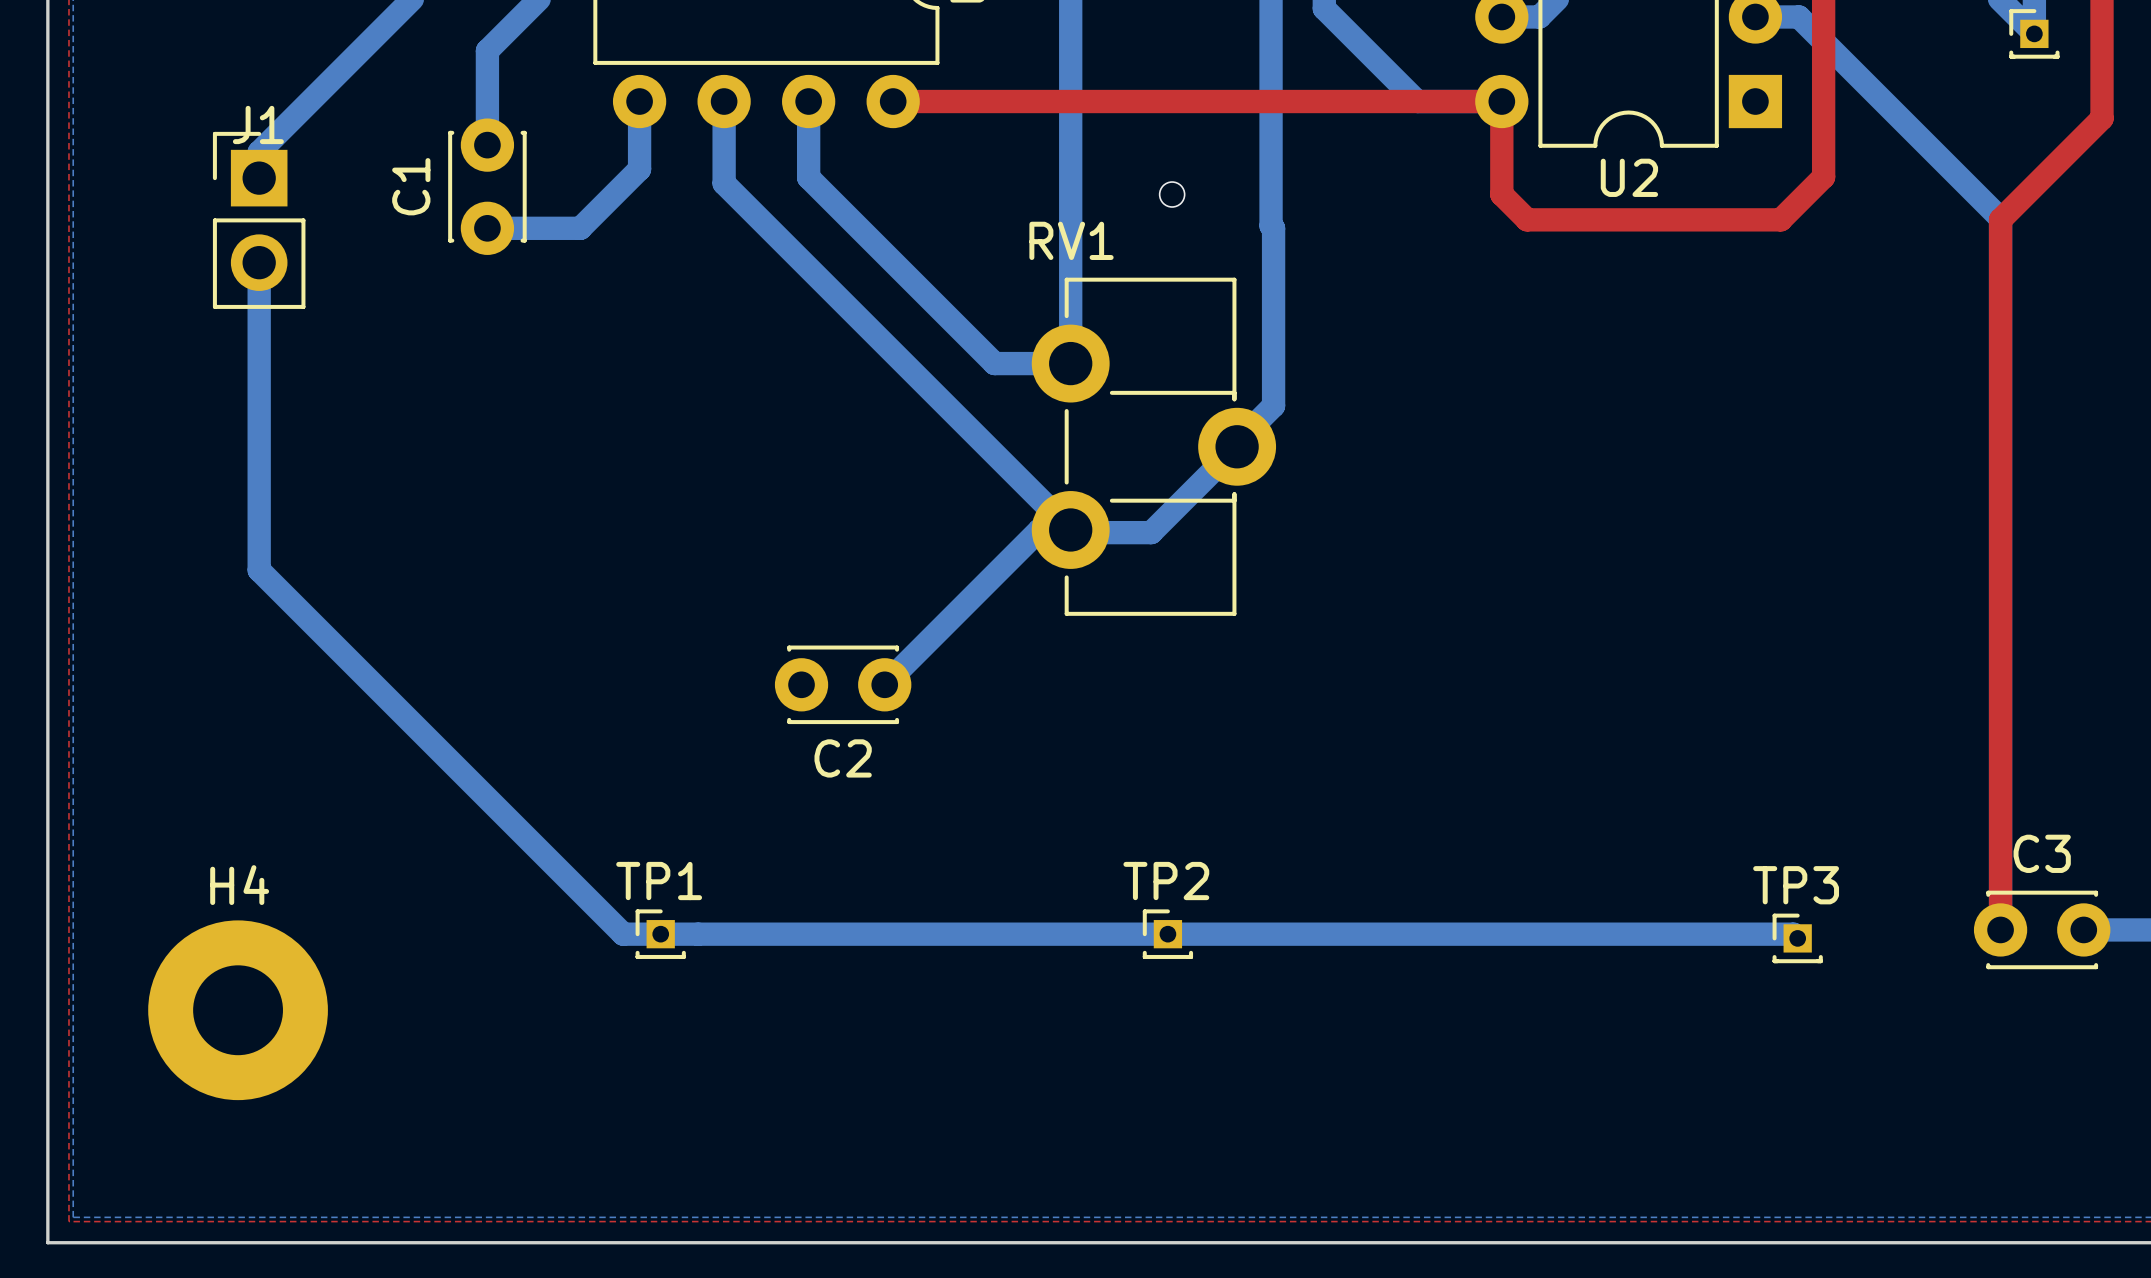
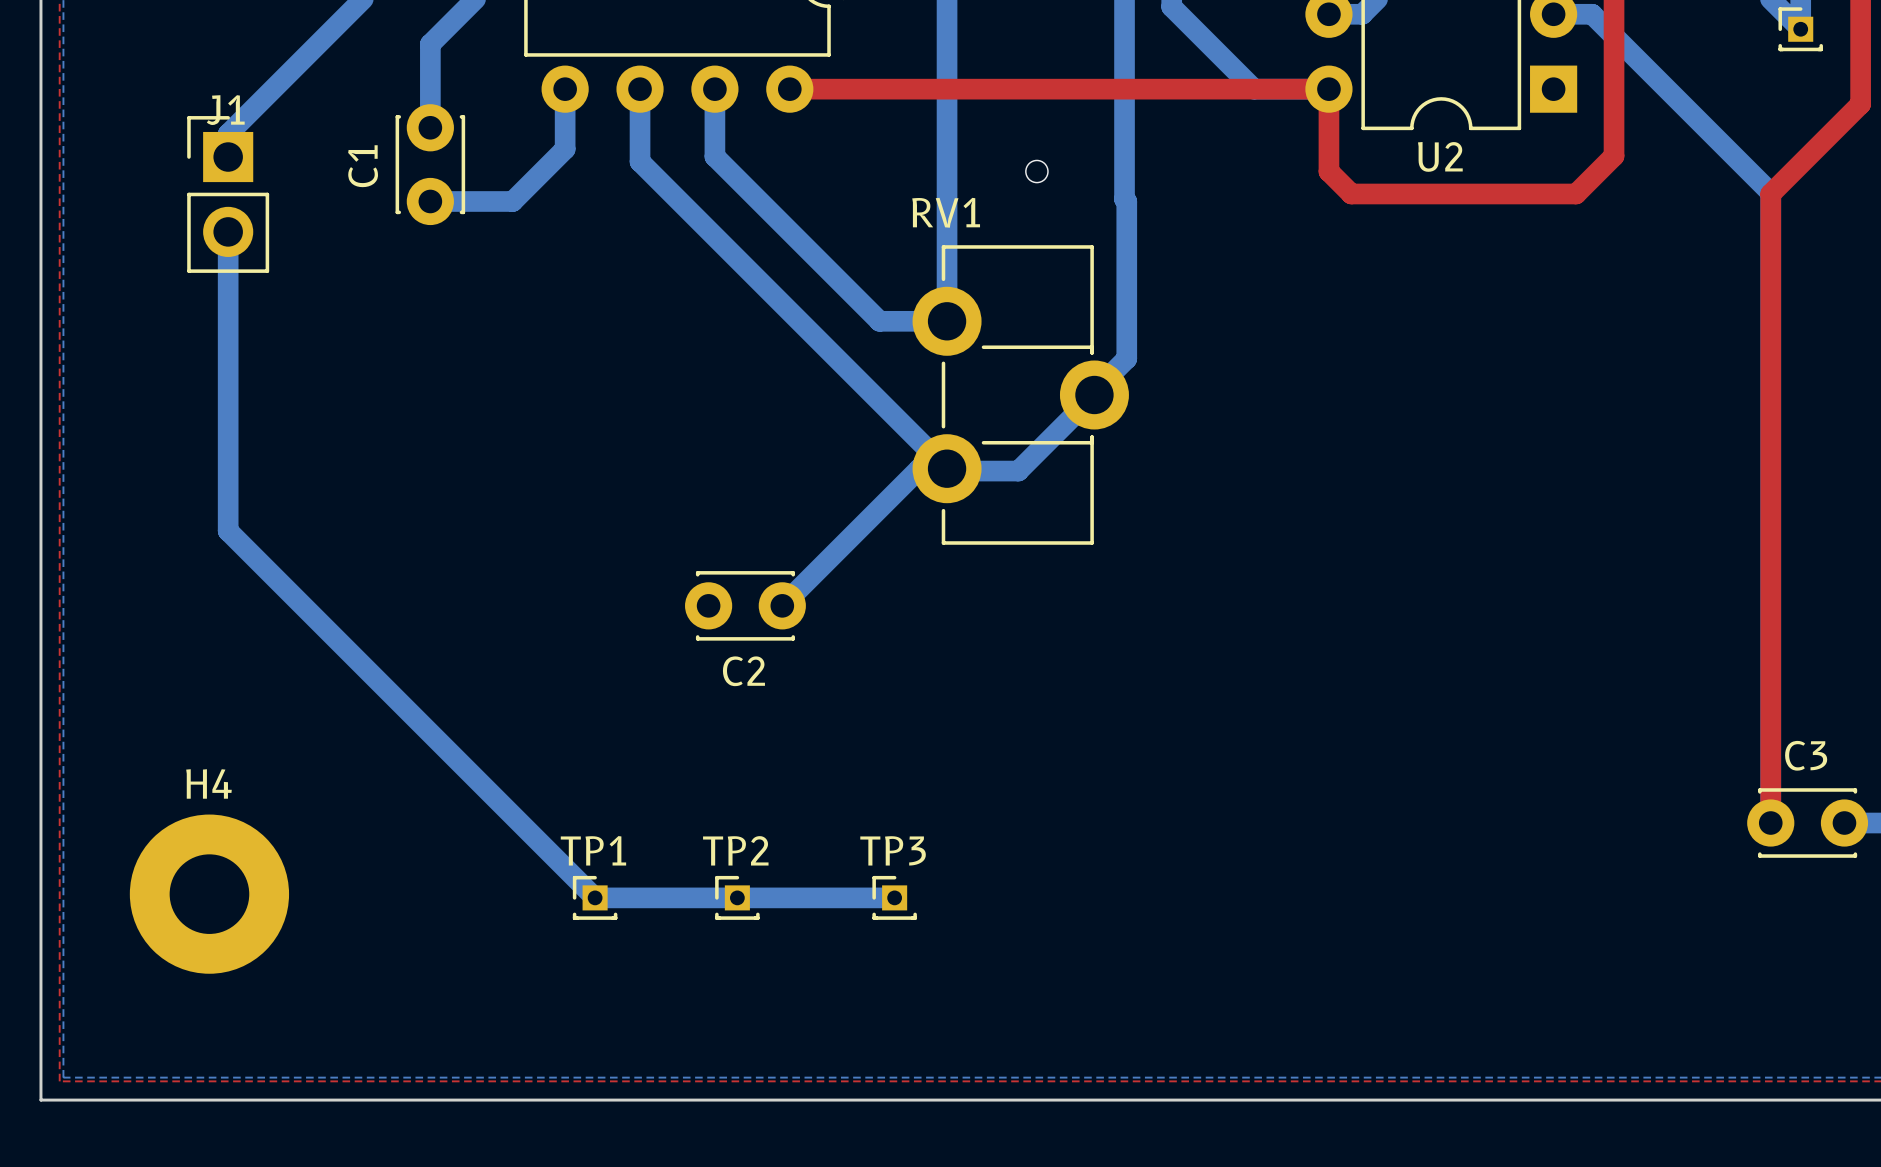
bottom track: (259, 570) (623, 934) (1793, 934) (1797, 938) -> (228, 504) (228, 530) (595, 897) (894, 897)
TP1 position: (660, 934) -> (595, 897)
TP2 position: (1167, 934) -> (737, 897)
TP3 position: (1797, 938) -> (894, 897)

